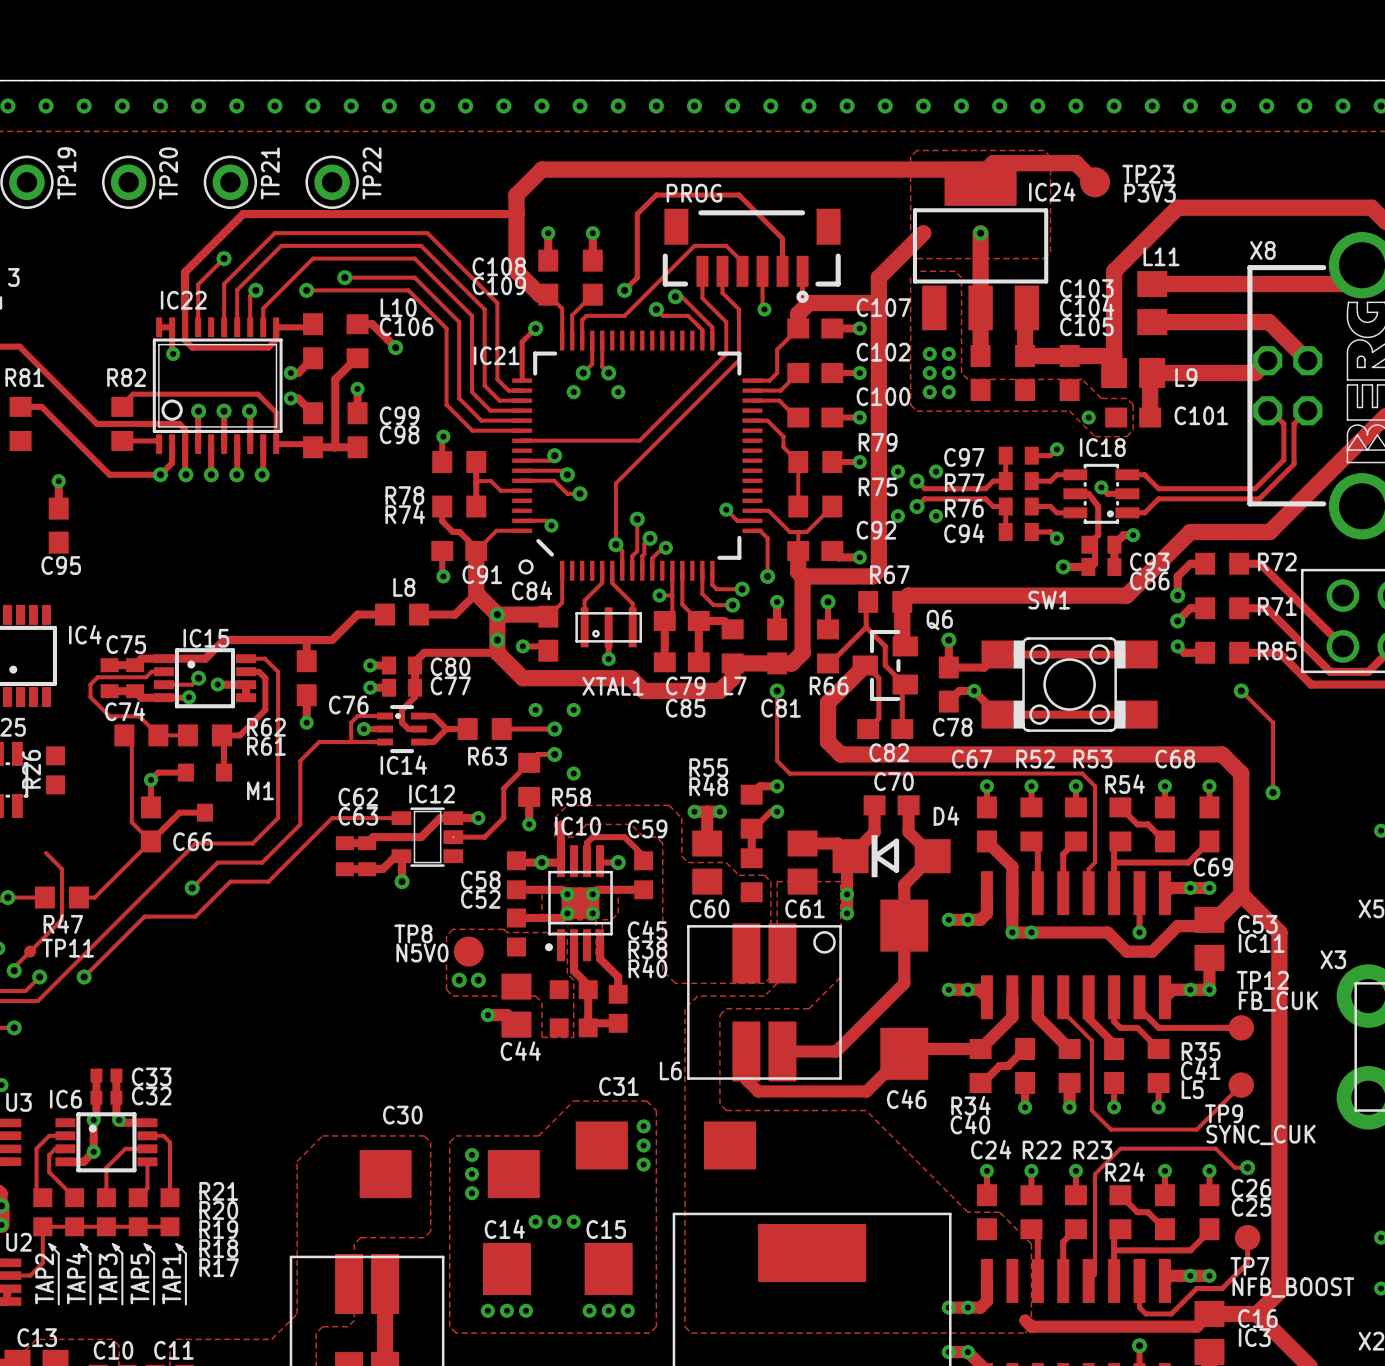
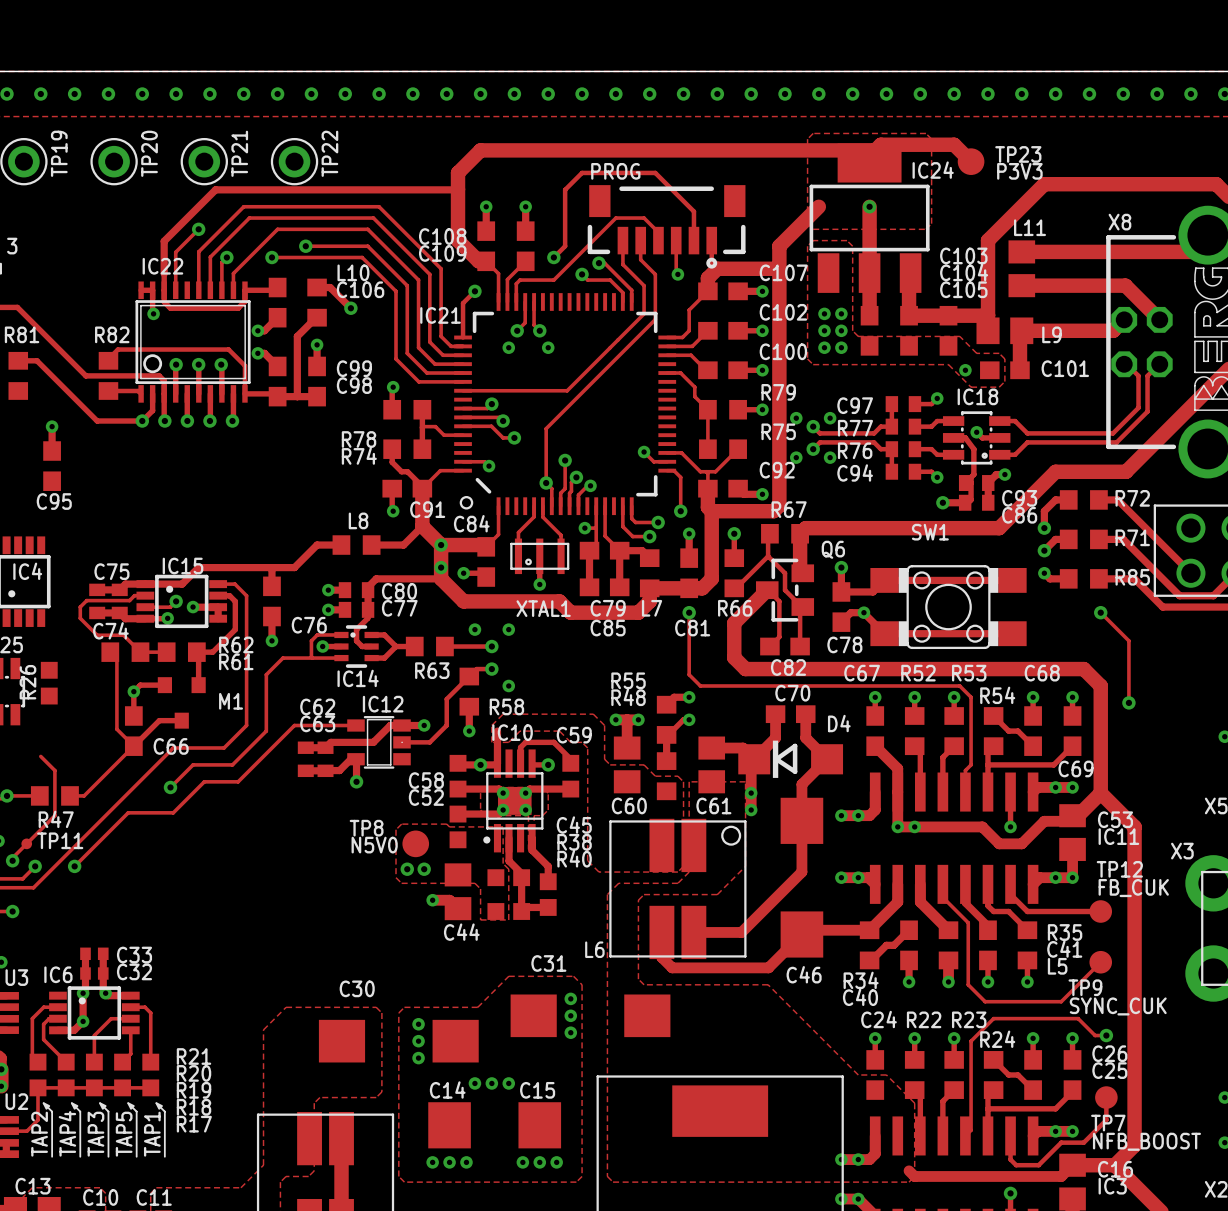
IC4 name position: IC4 (85, 634) -> IC4 (27, 571)

